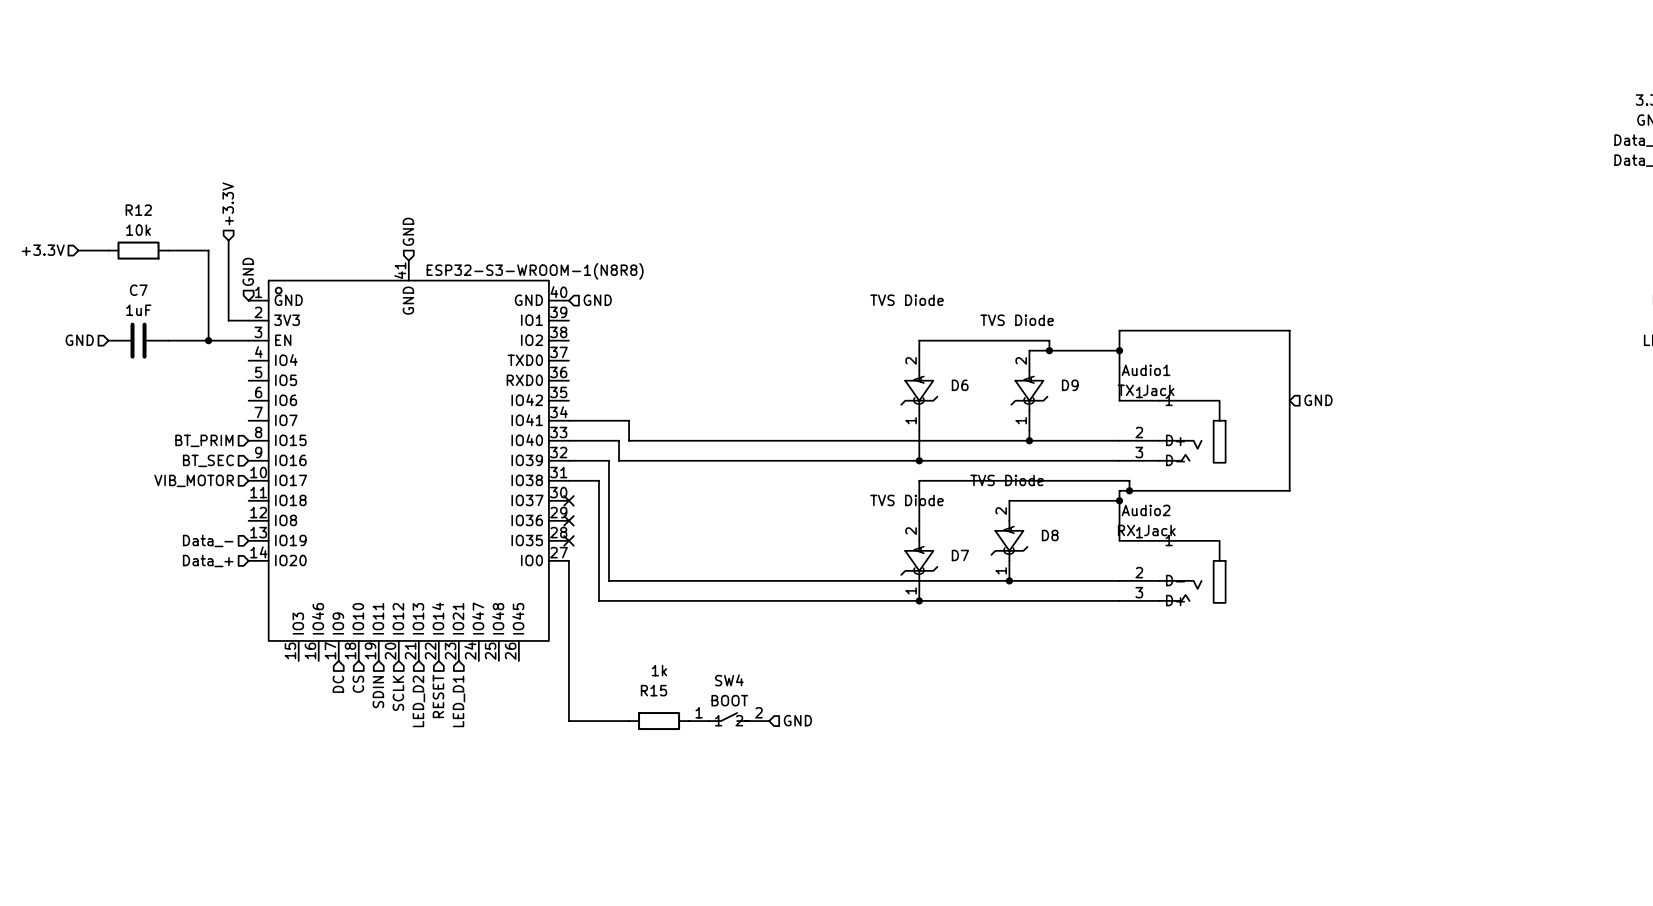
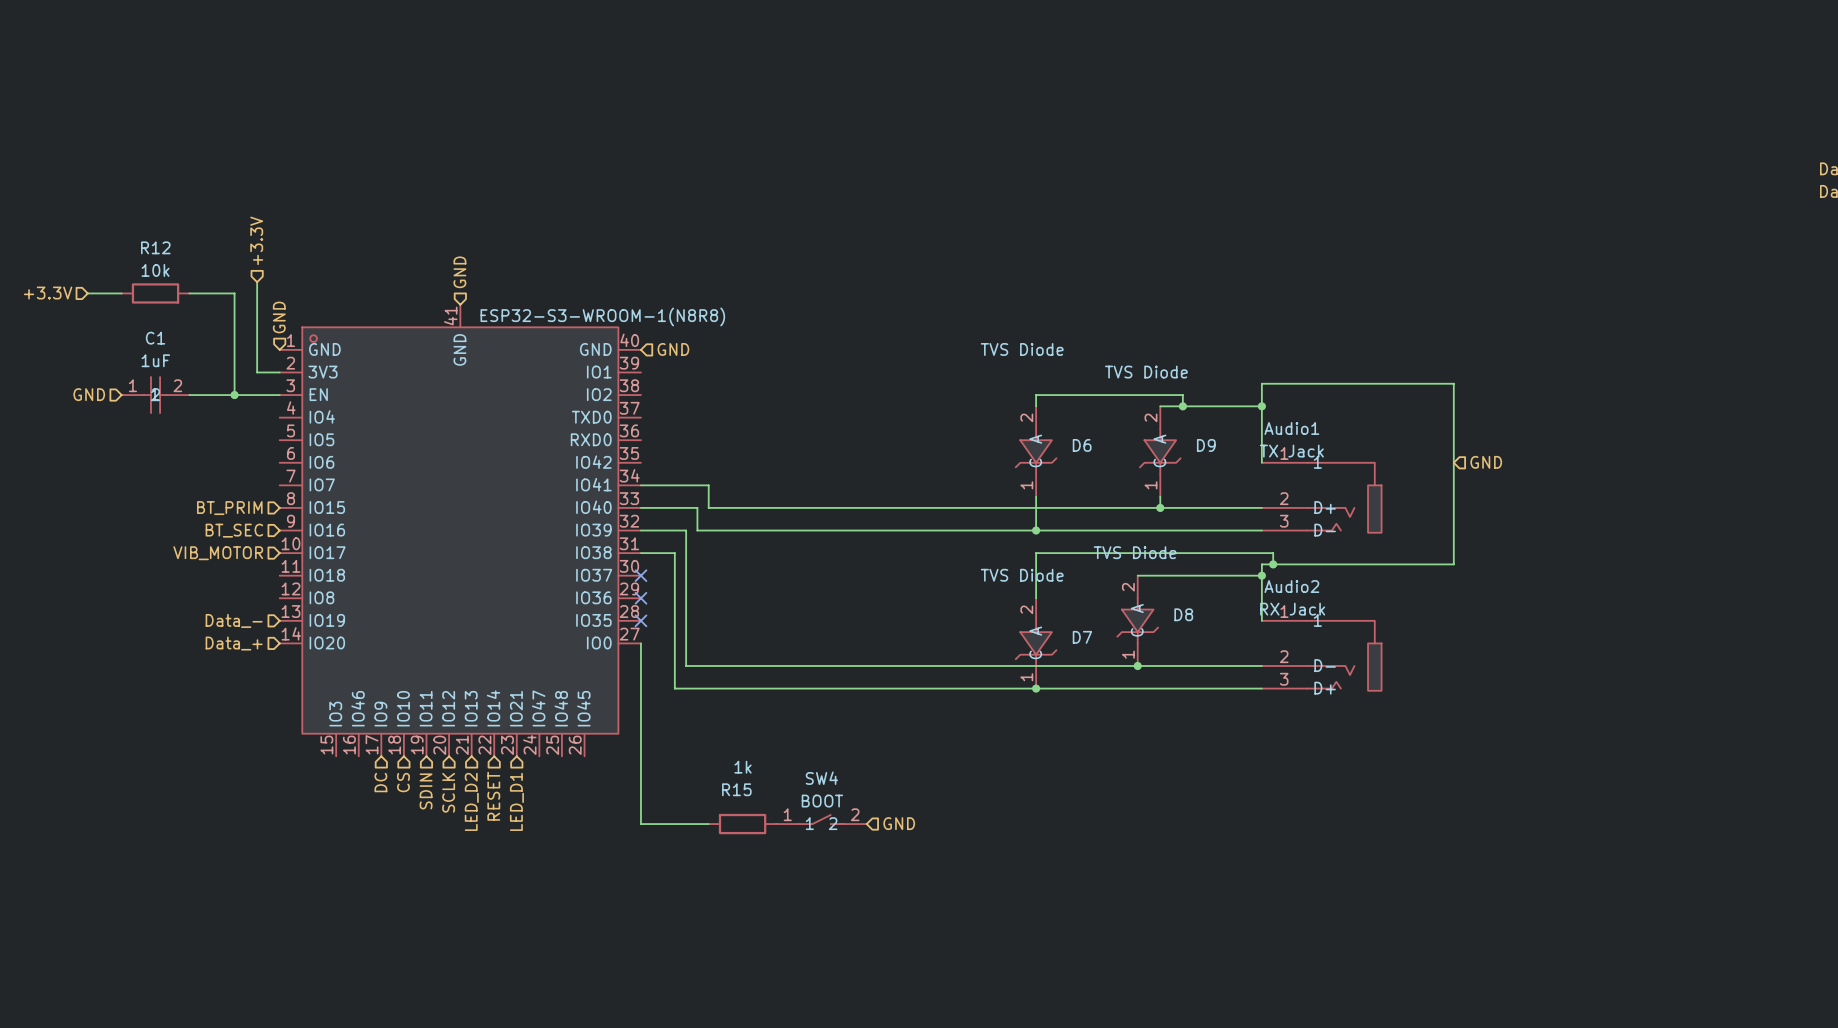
C7: 1uF (138, 340) -> none
C1: none -> 1uF (155, 395)

